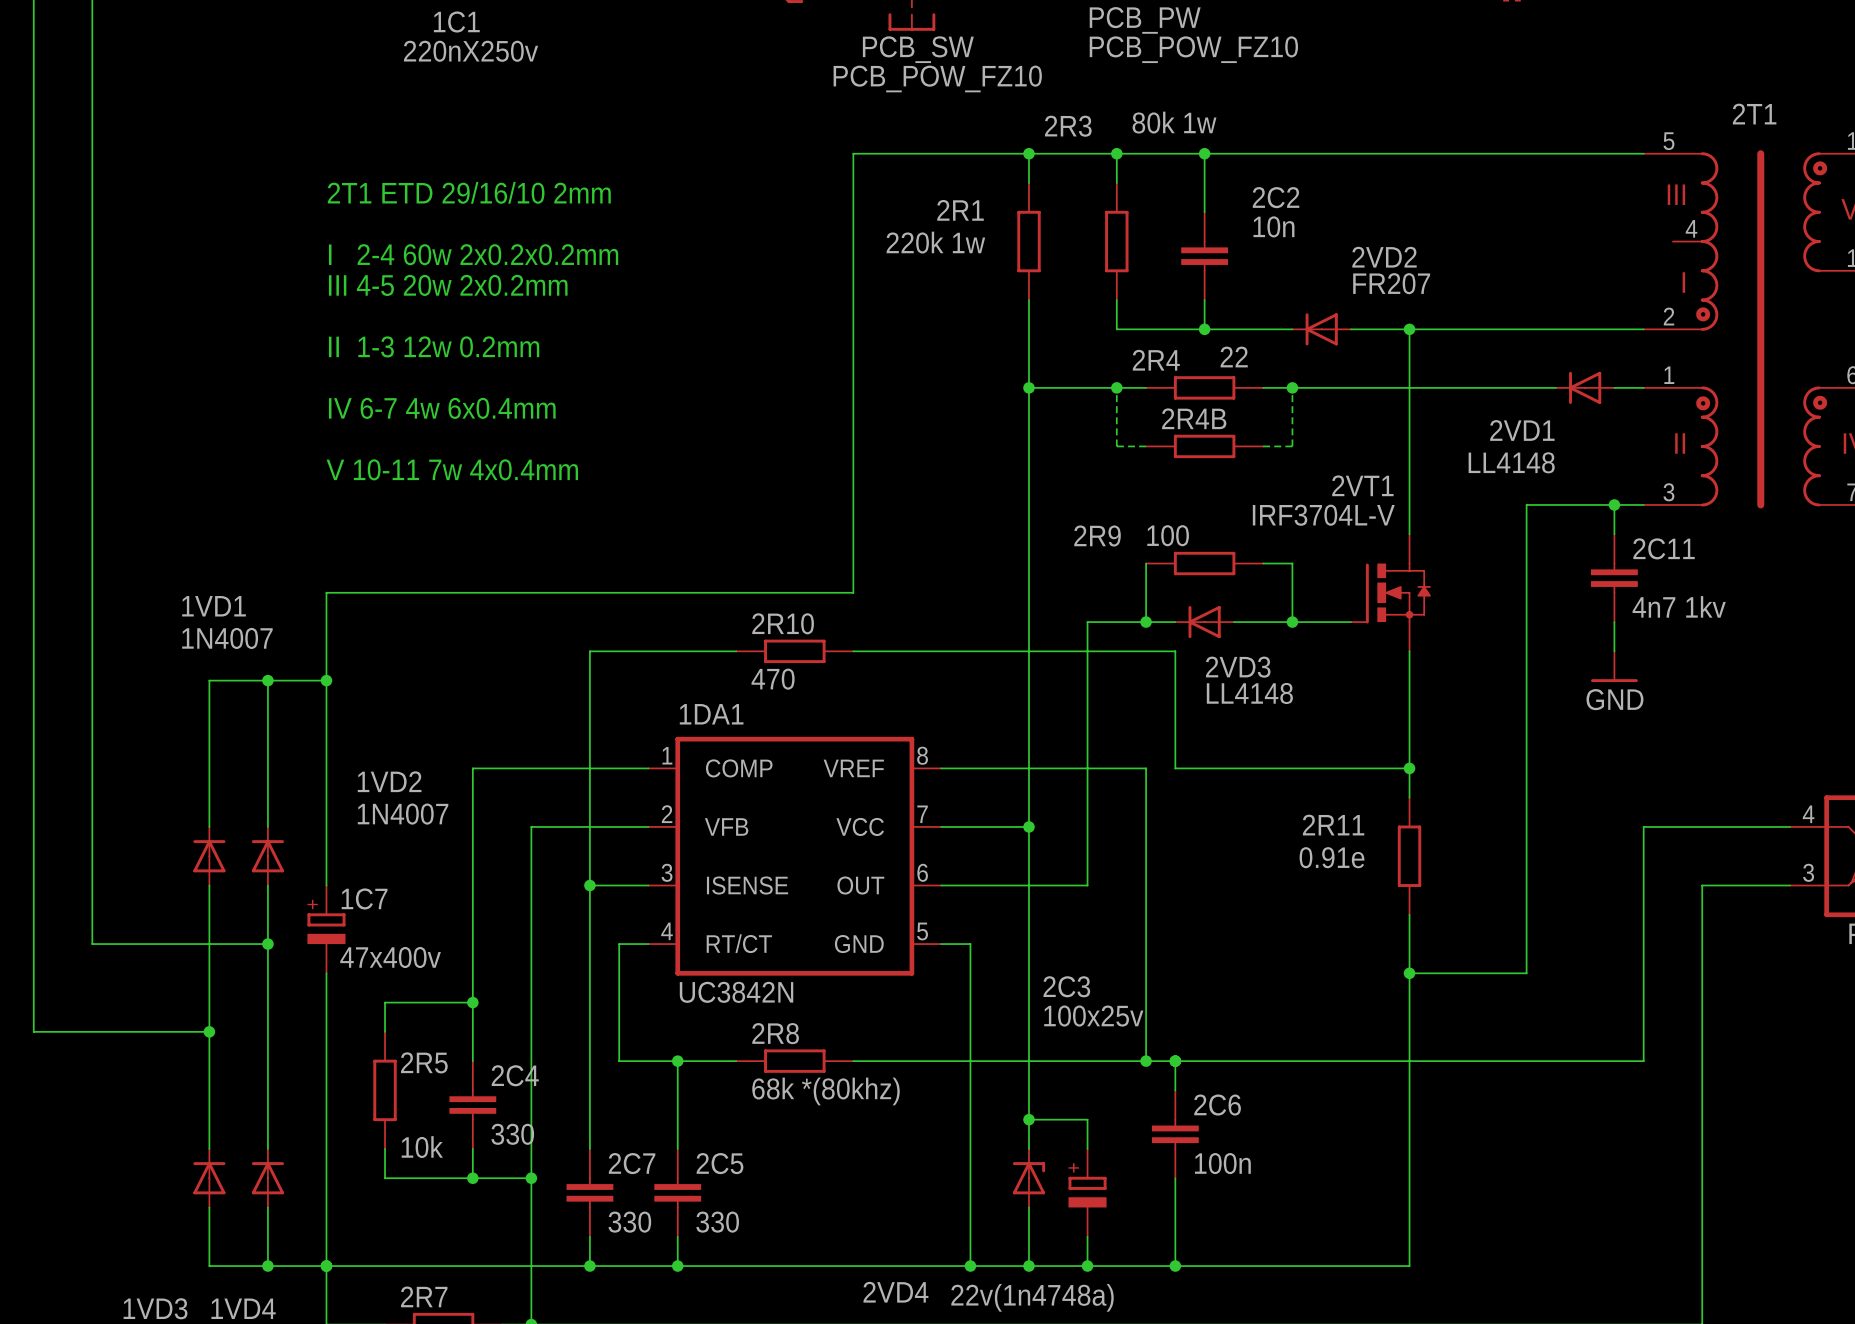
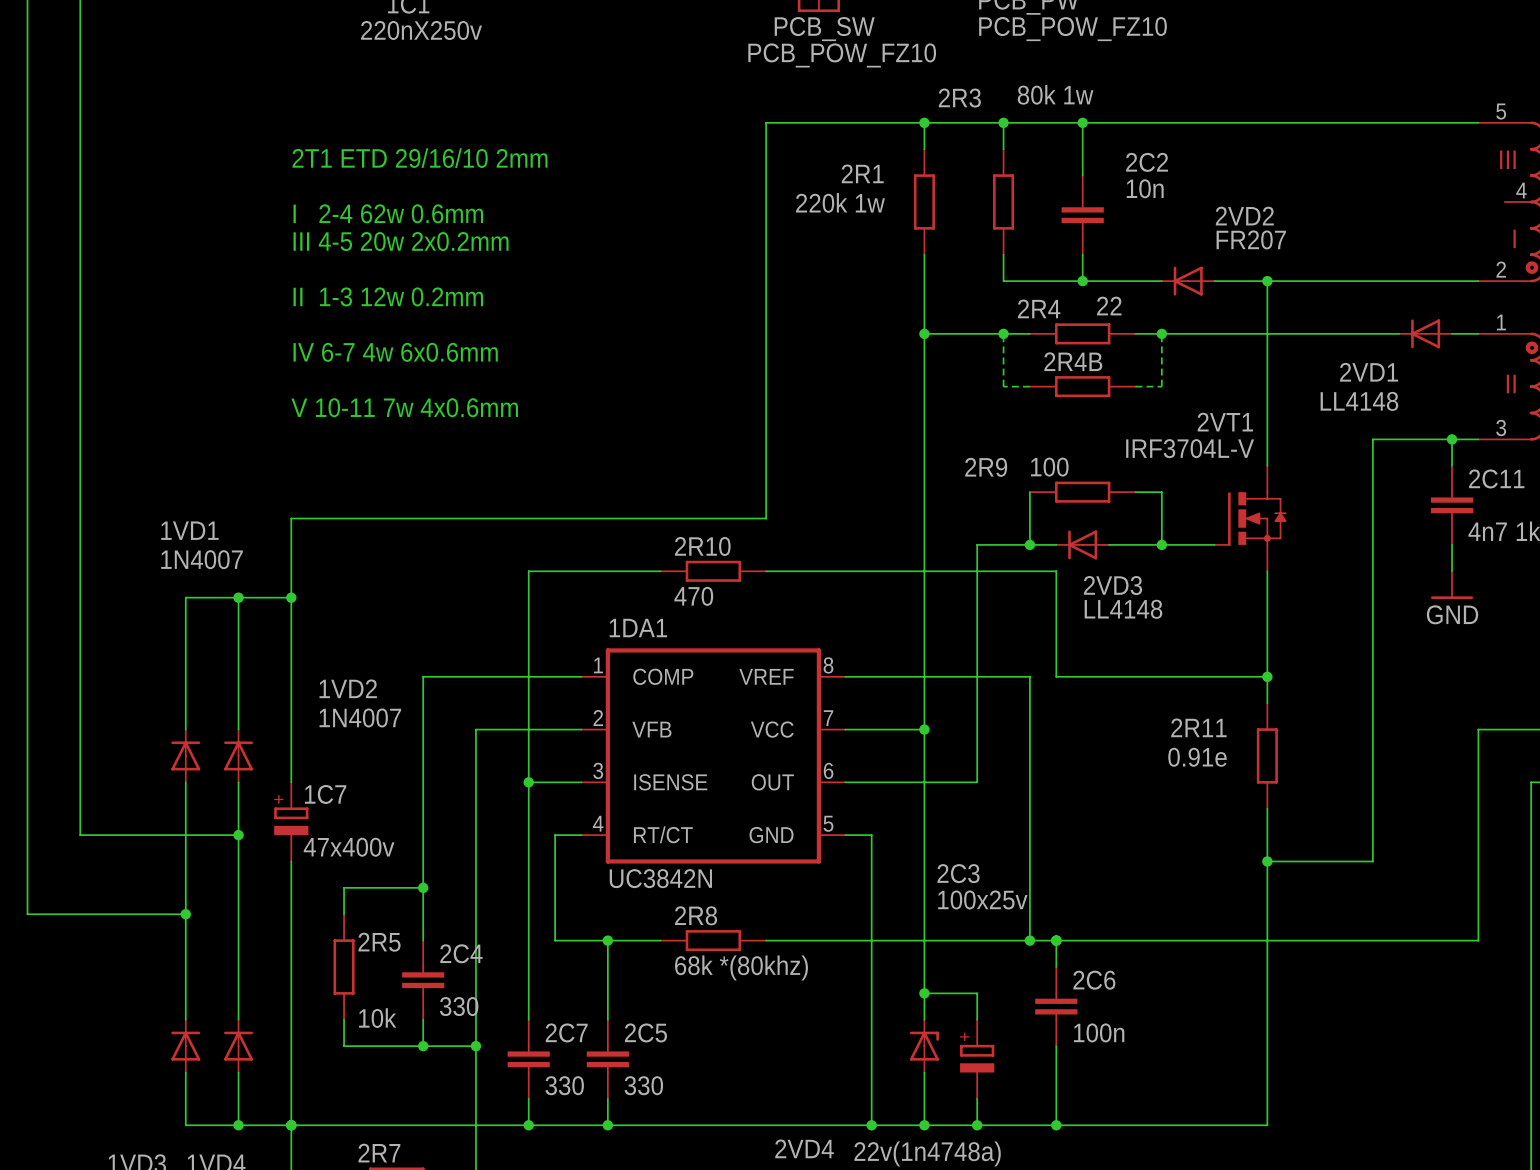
text: I 2-4 60w 2x0.2x0.2mm (473, 254) -> I 2-4 62w 0.6mm (388, 213)
text: IV 6-7 4w 6x0.4mm (442, 408) -> IV 6-7 4w 6x0.6mm (395, 352)
text: V 10-11 7w 4x0.4mm (452, 469) -> V 10-11 7w 4x0.6mm (404, 407)

